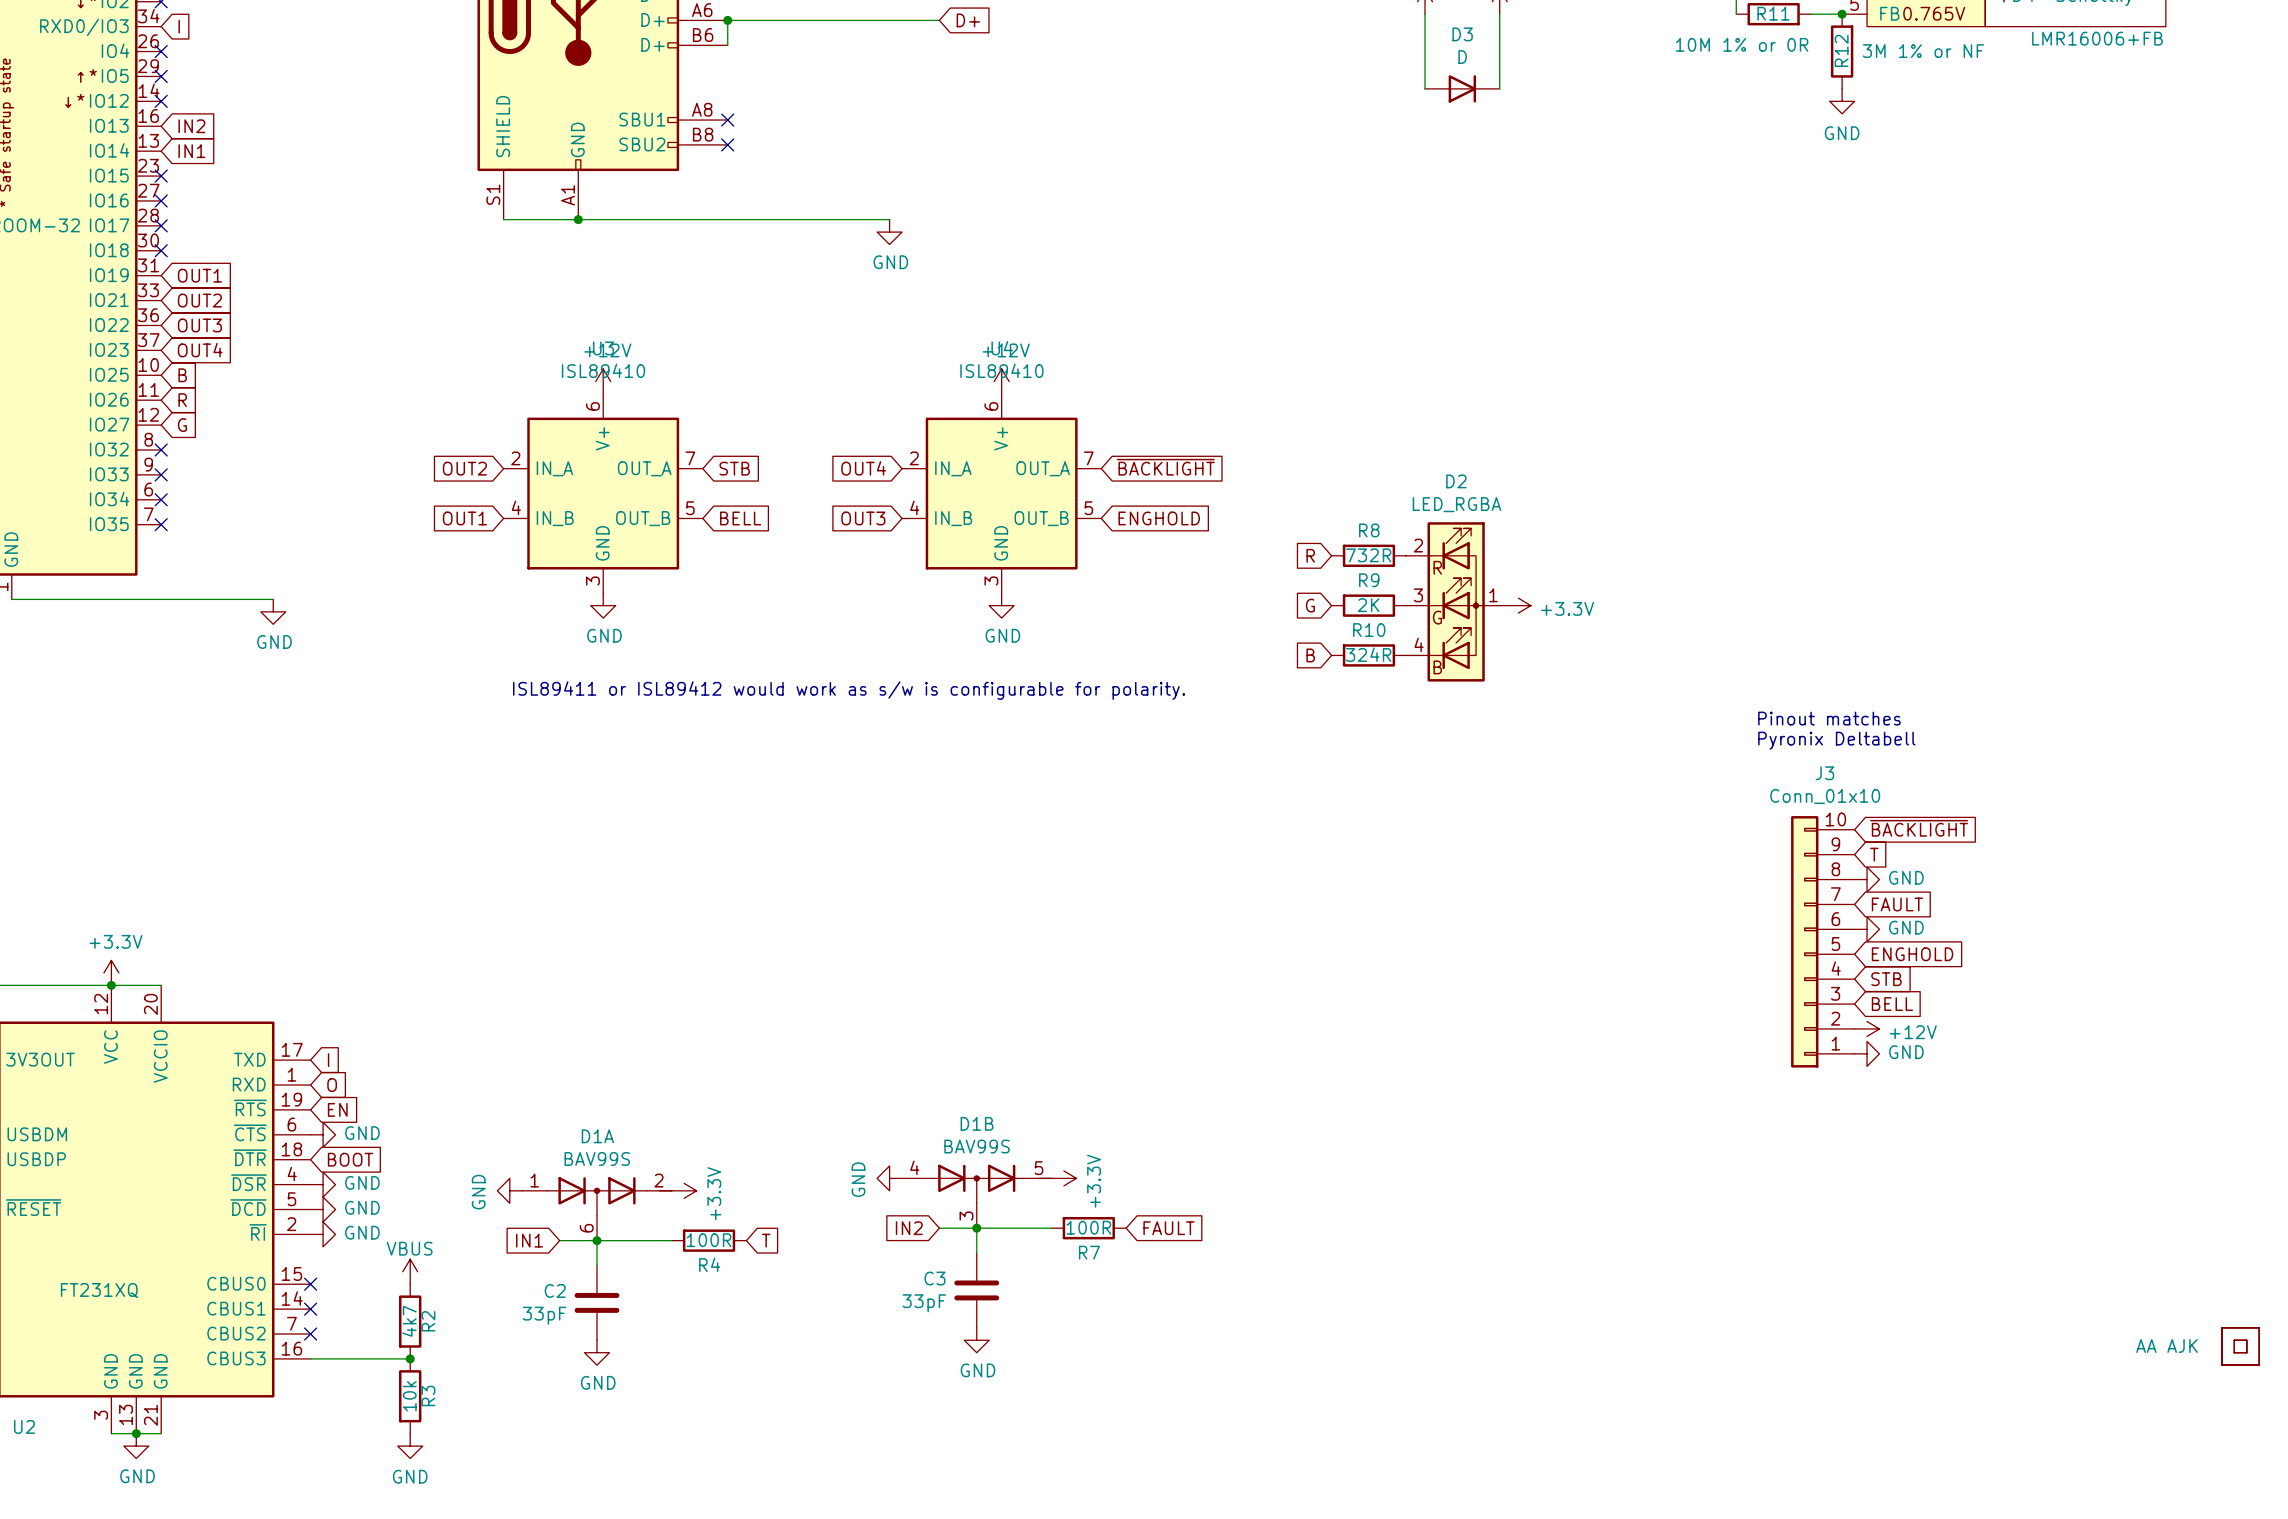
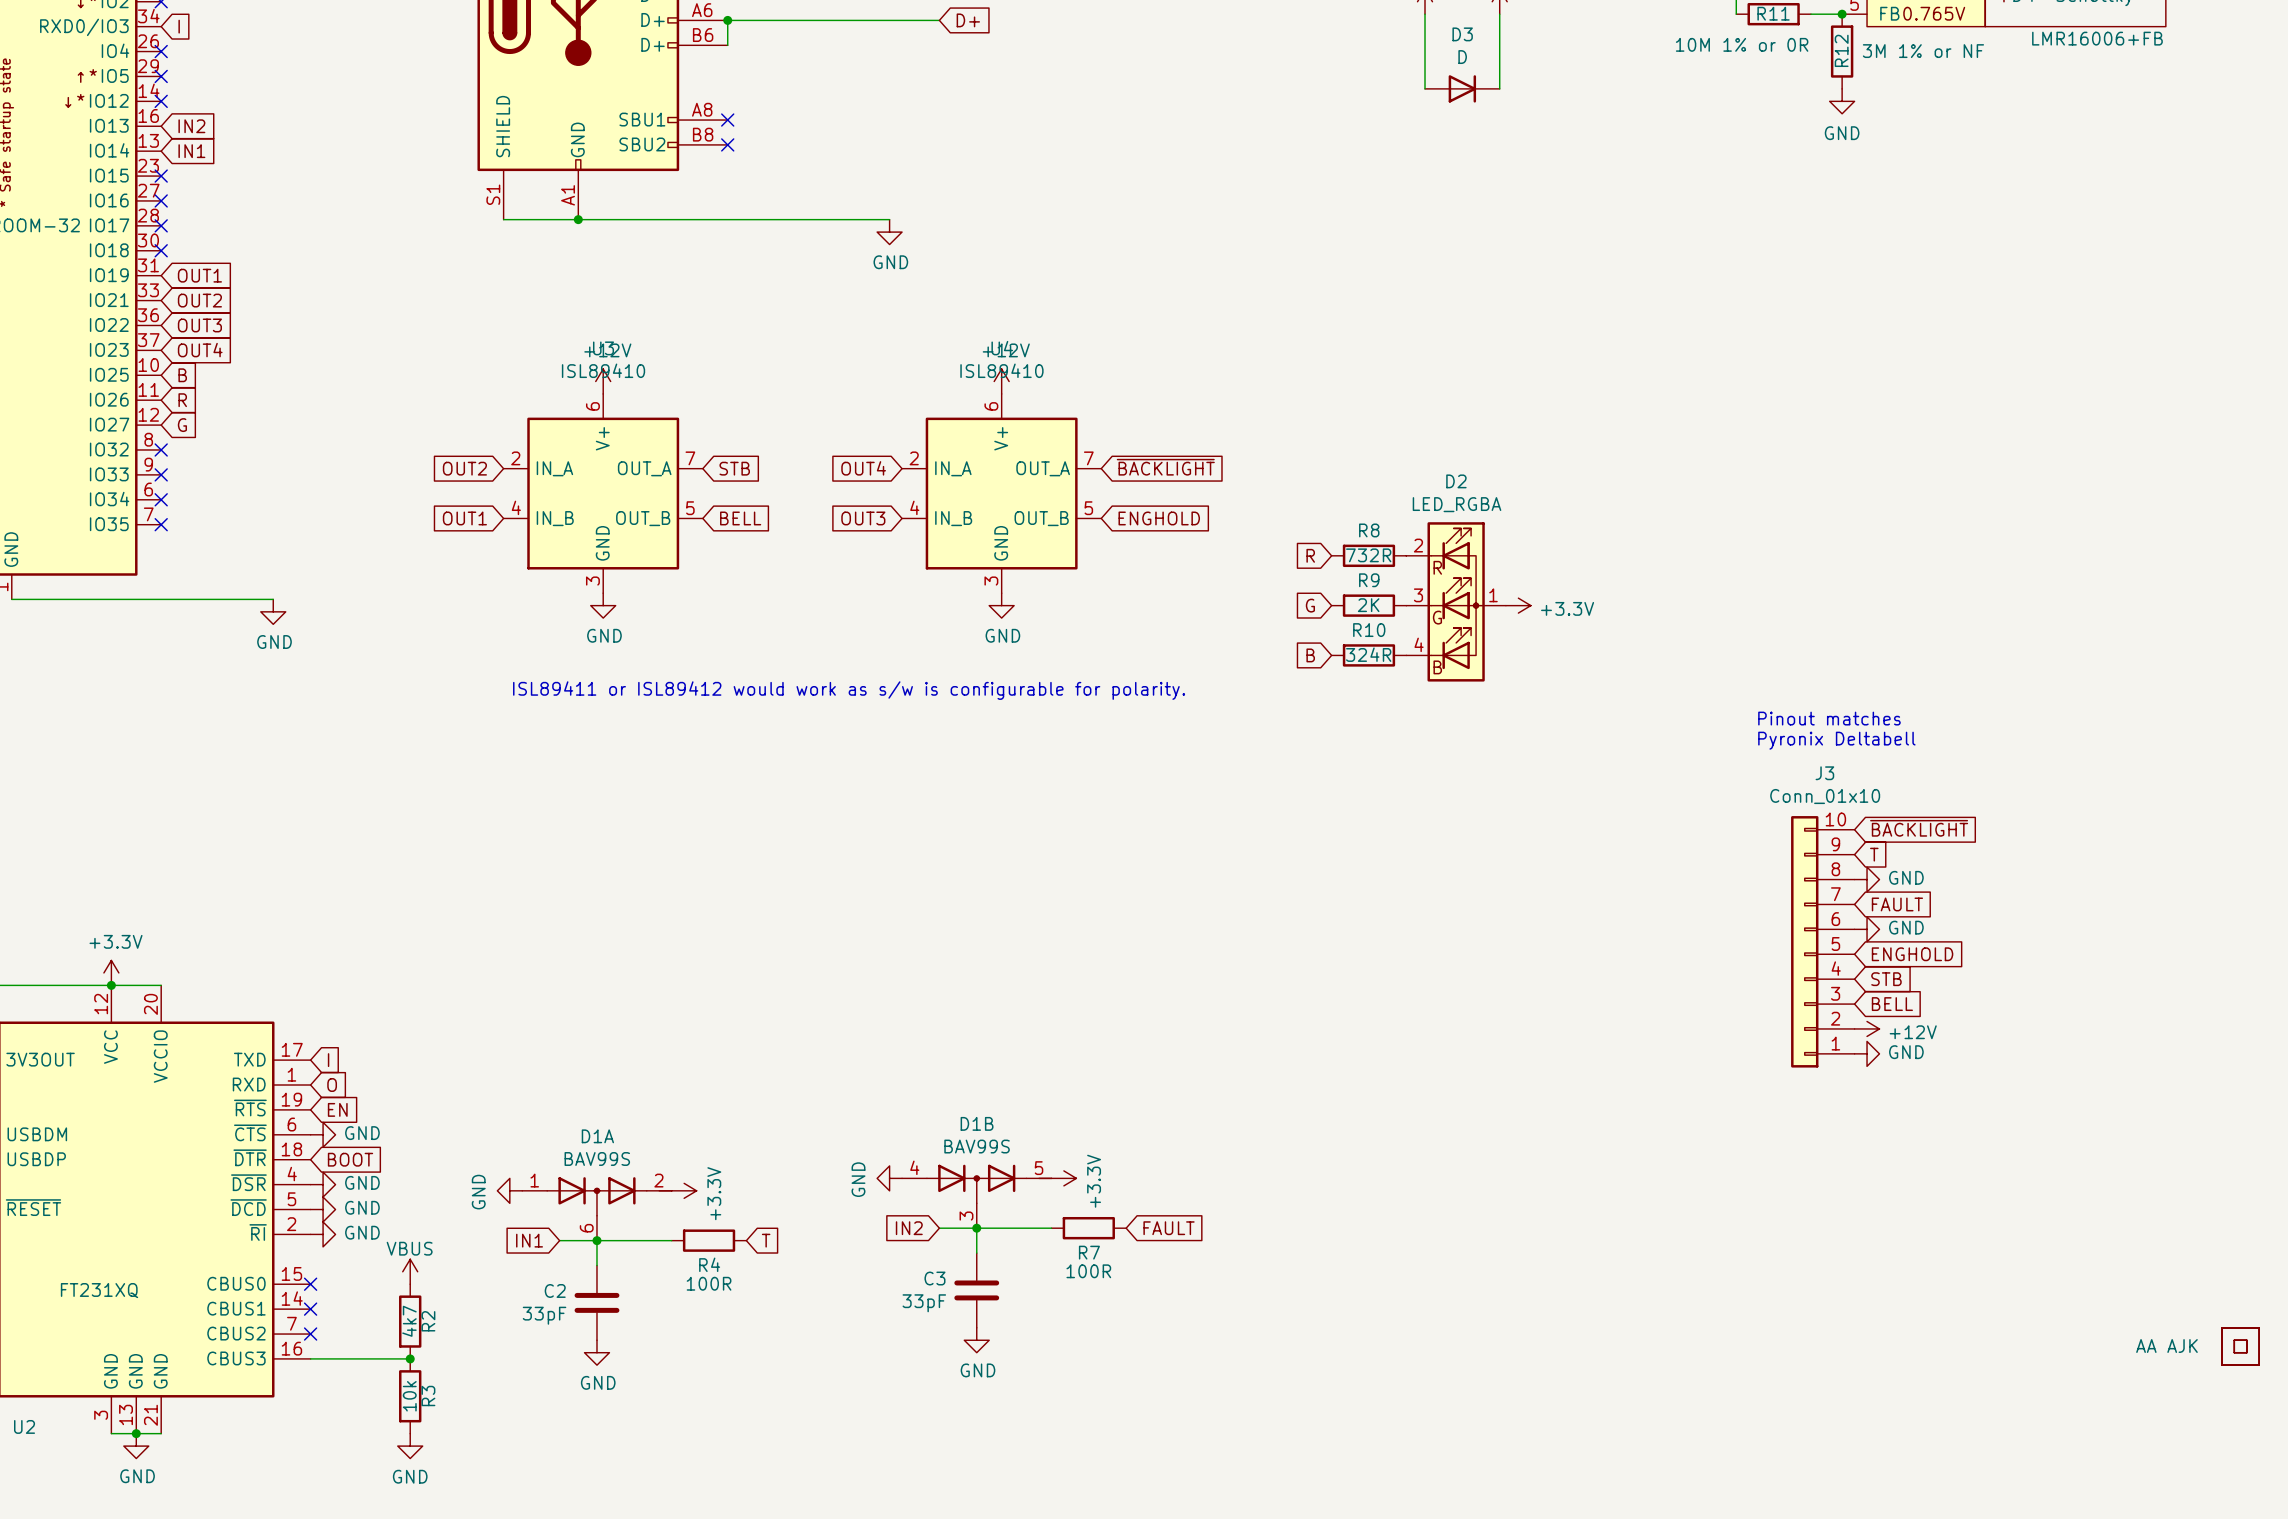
R7 value position: 100R (1088, 1227) -> 100R (1088, 1271)
R4 value position: 100R (709, 1240) -> 100R (709, 1283)

